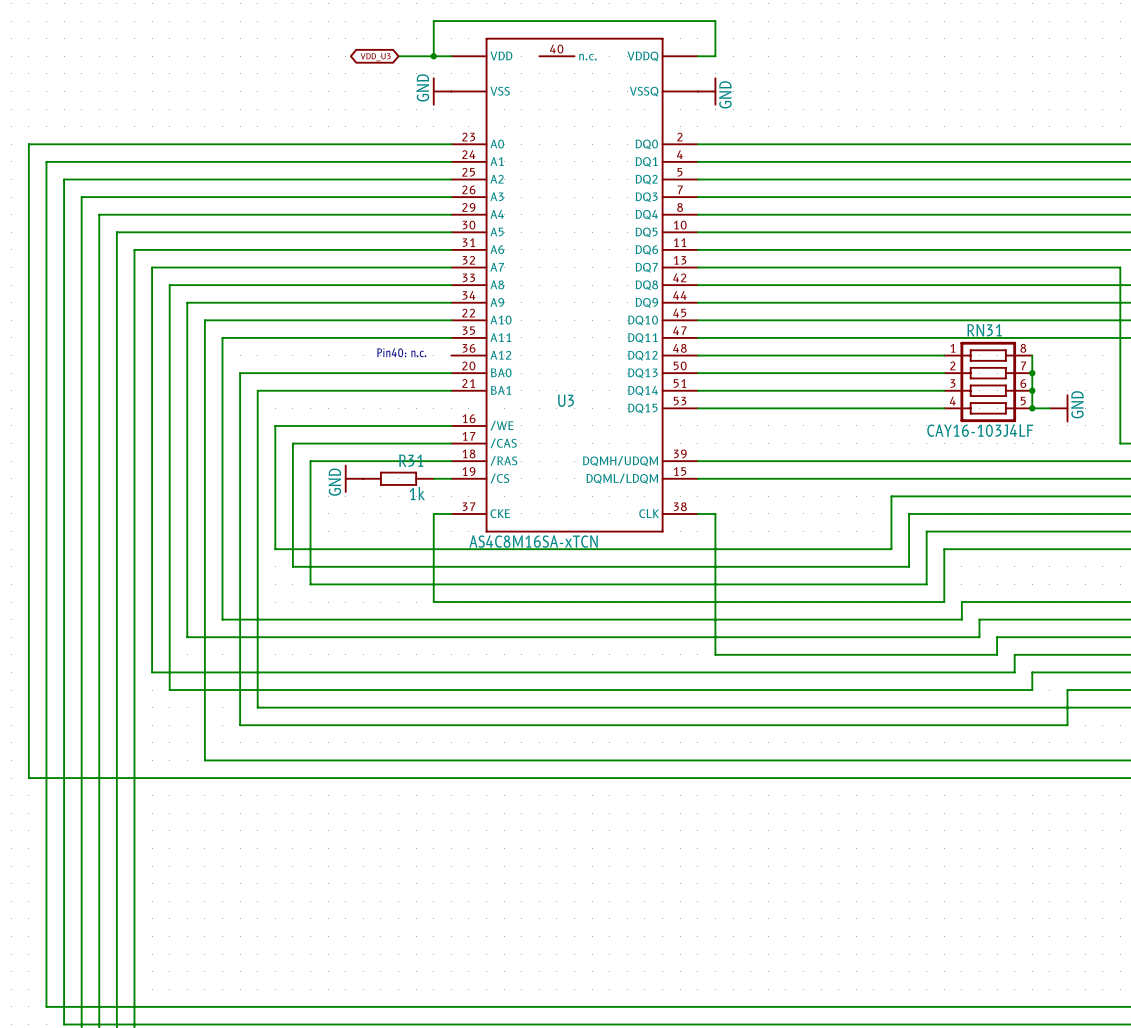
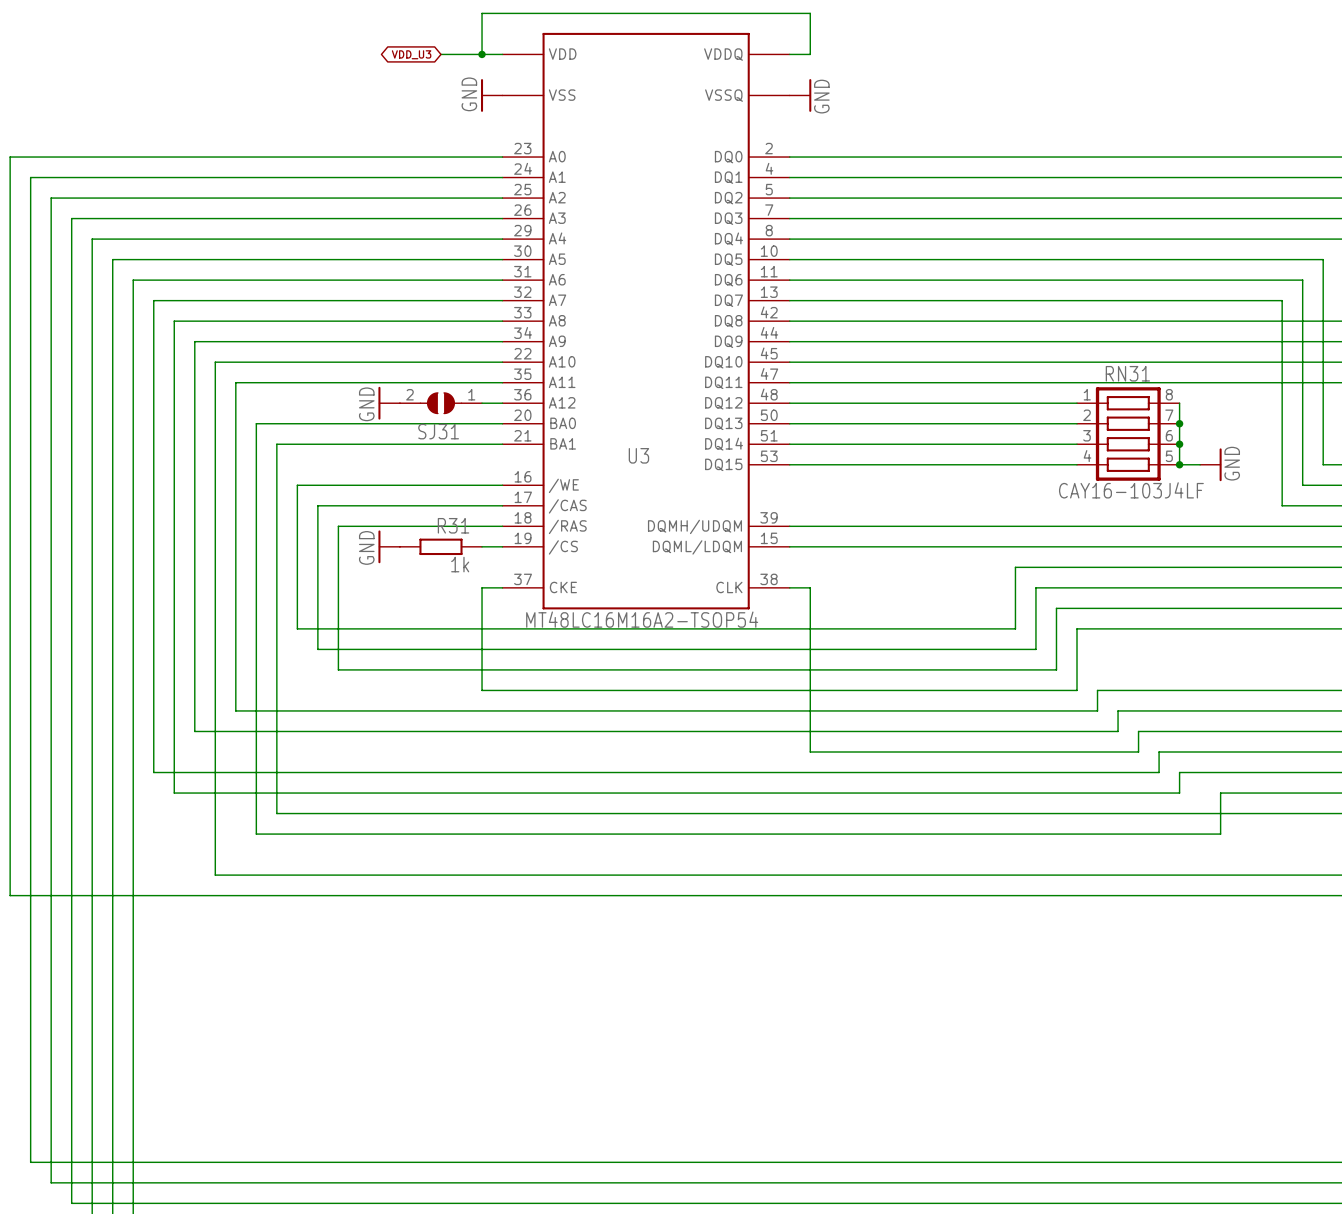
U3 symbol: [451, 37, 698, 533] -> [502, 32, 790, 610]
text: Pin40: n.c. (401, 352) -> none
power symbol: none -> GND (389, 403)
SJ31: none -> (440, 403)
wire: none -> (482, 403) (502, 403)
U3 value: AS4C8M16SA-xTCN (533, 541) -> MT48LC16M16A2-TSOP54 (642, 619)

